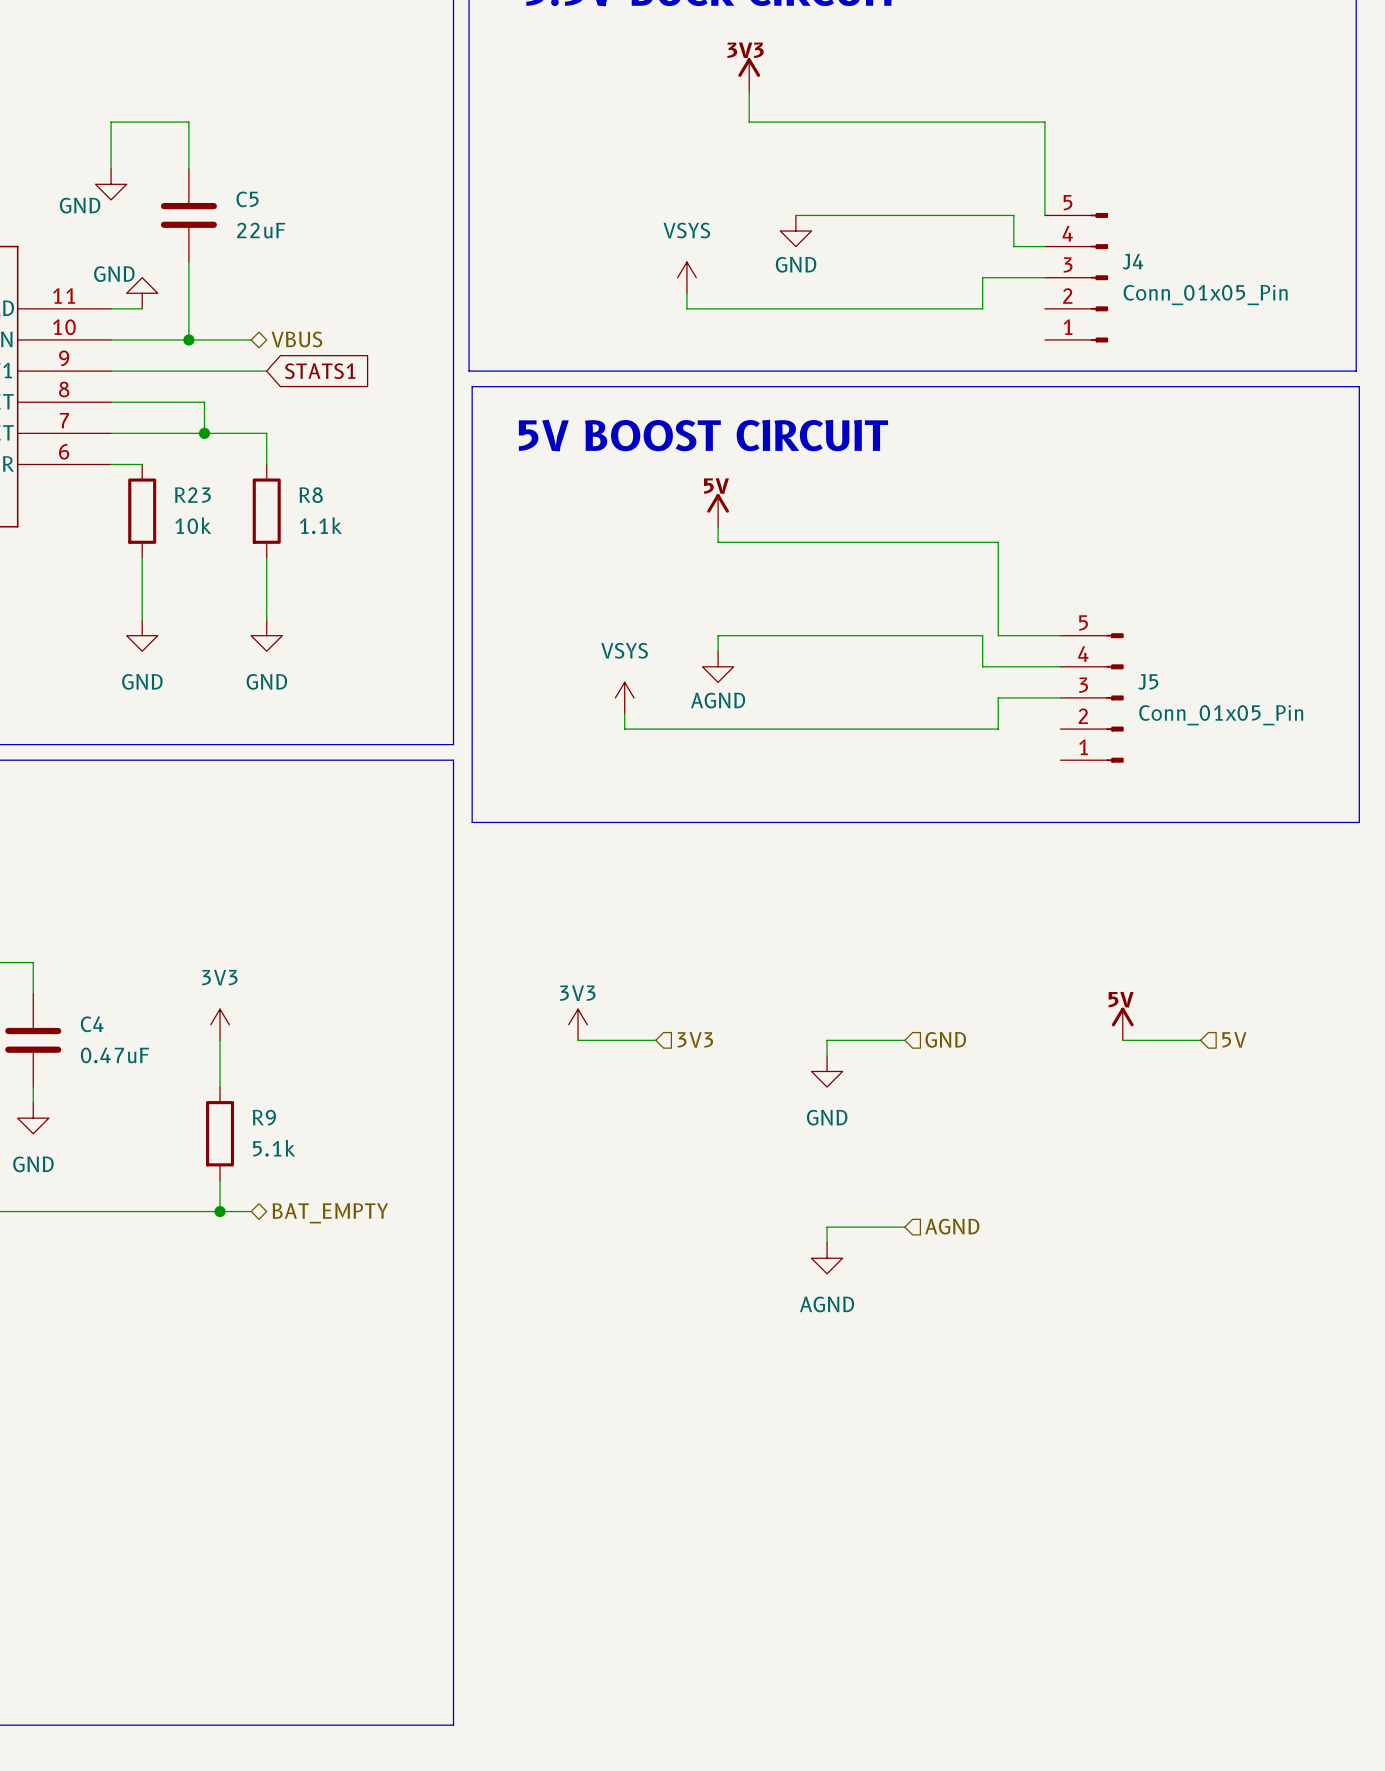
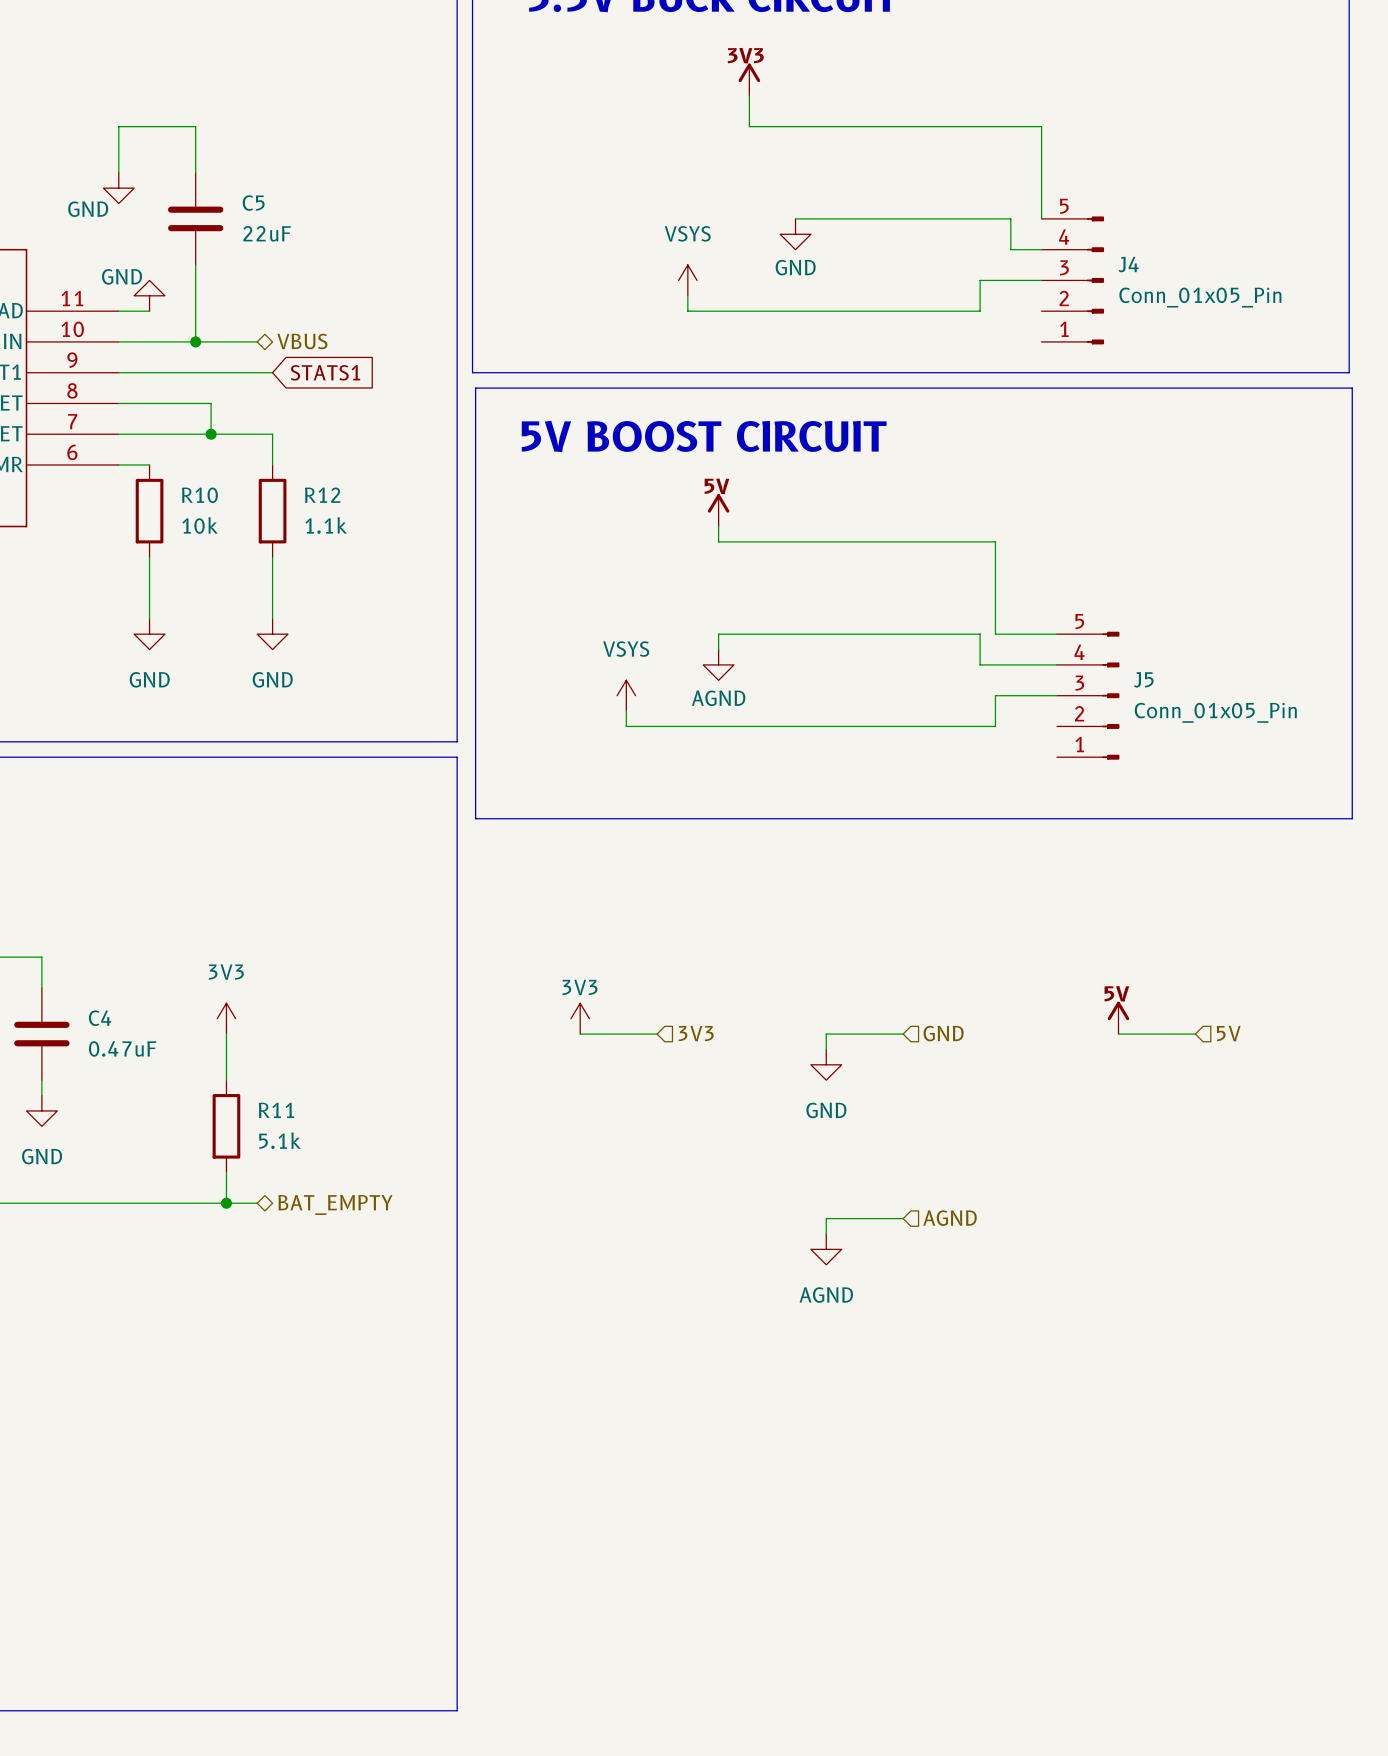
R23 name: R23 (192, 495) -> R10 (199, 495)
R8 name: R8 (311, 495) -> R12 (322, 495)
R9 name: R9 (264, 1117) -> R11 (276, 1110)

